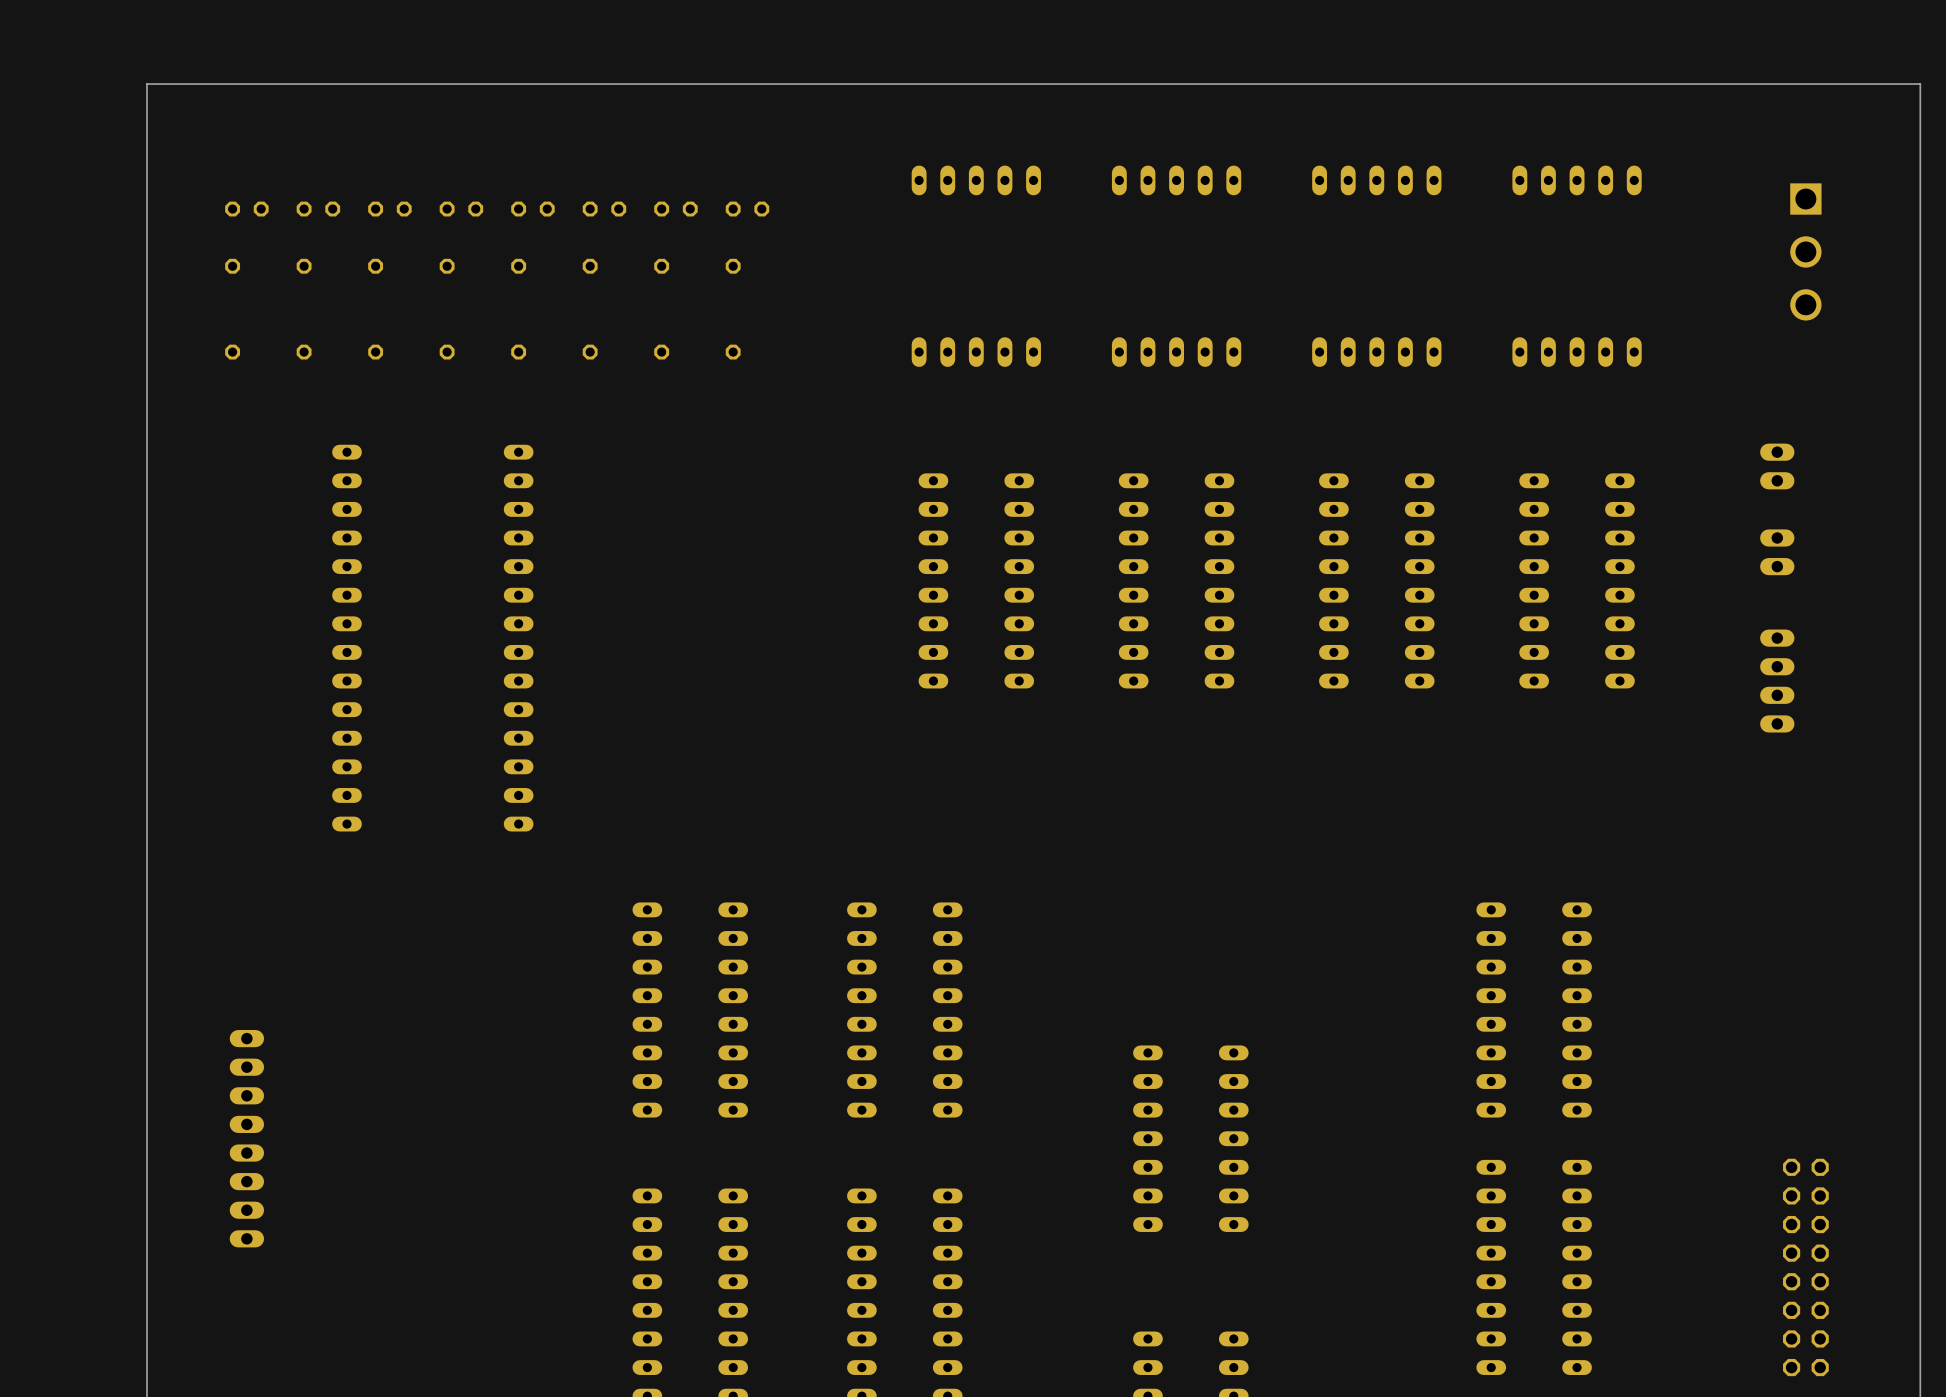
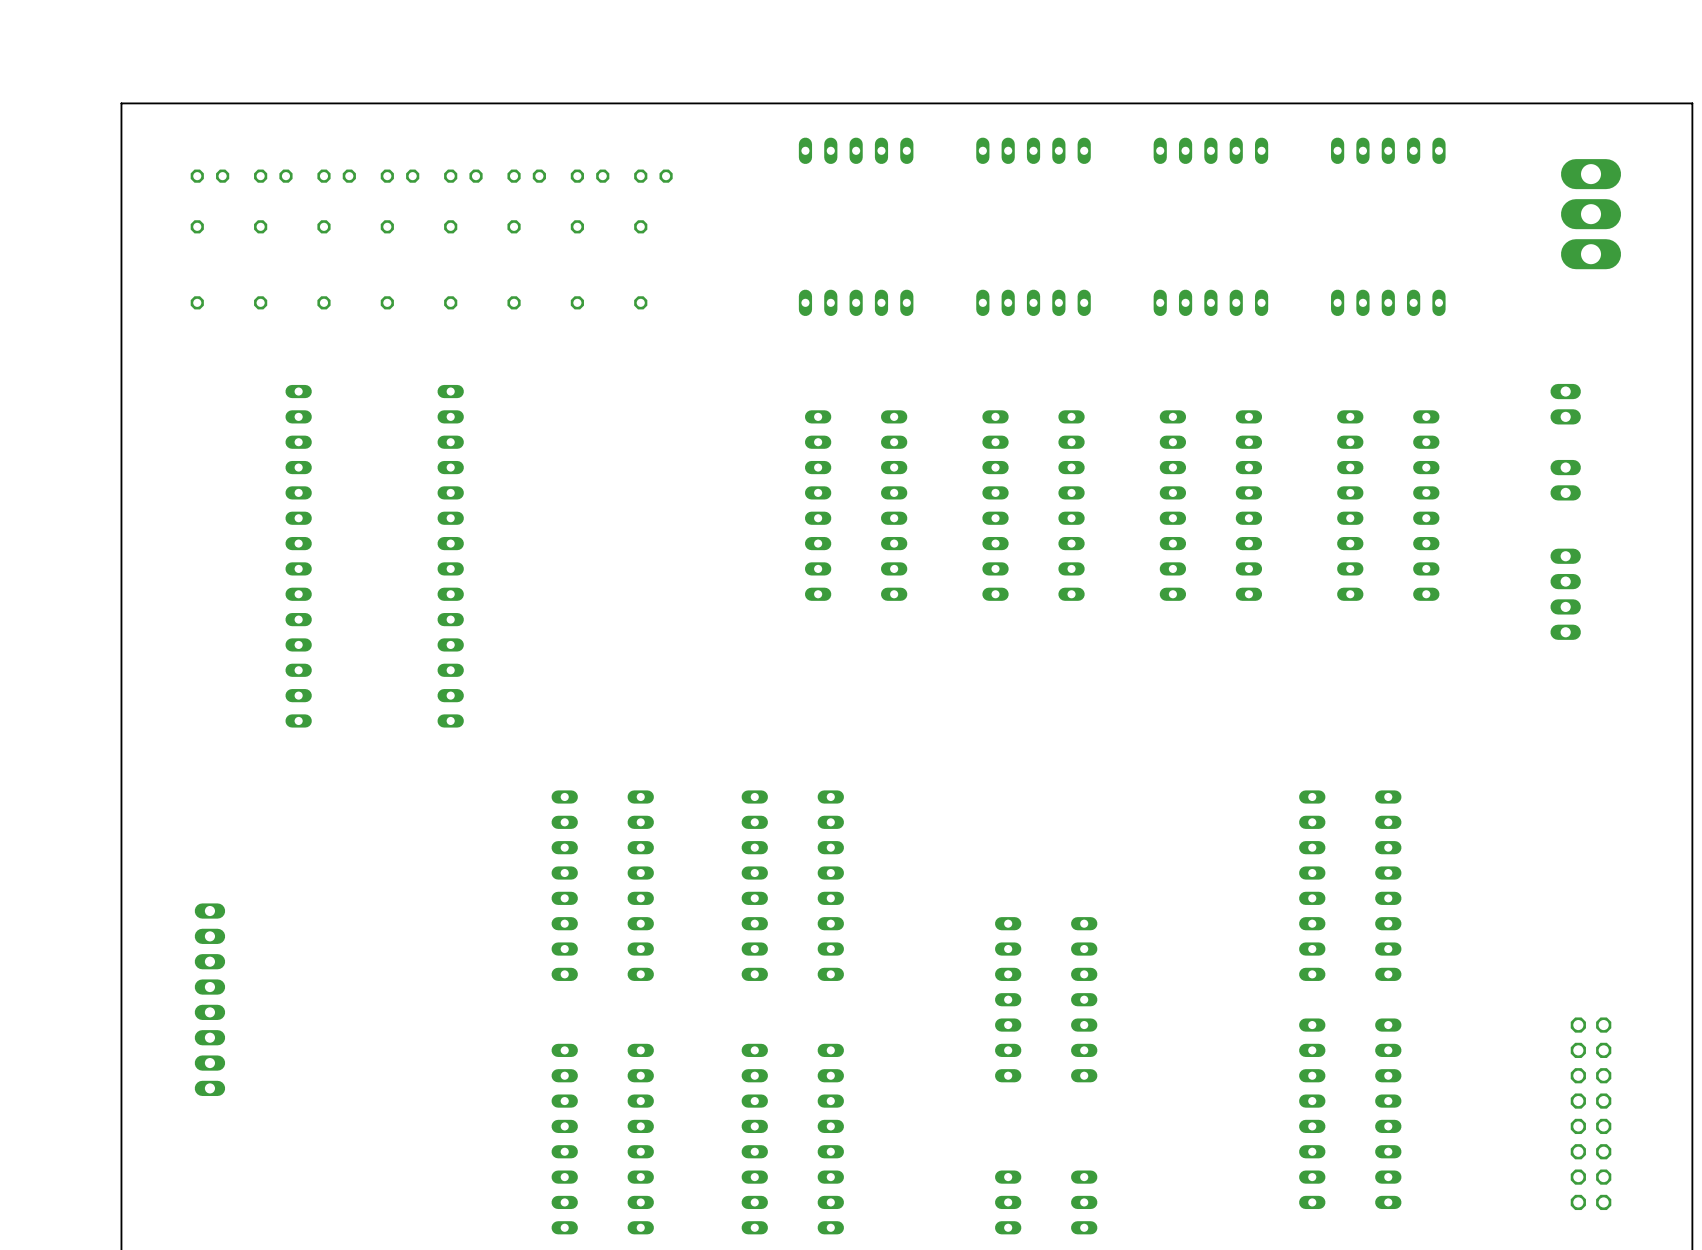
board edge: (1920, 126) (1920, 84) (146, 84) (146, 126) -> (1692, 103) (121, 103)
part footprint: [1790, 183, 1822, 321] -> [1560, 159, 1622, 270]

